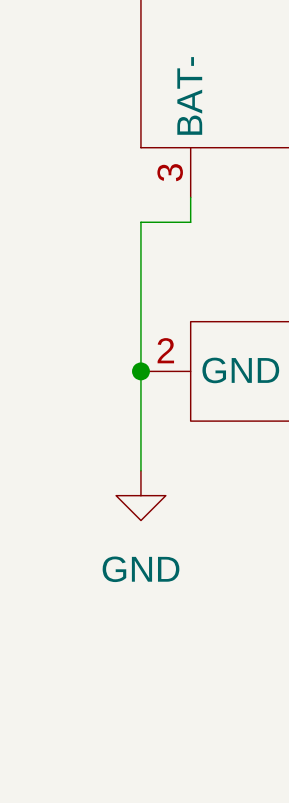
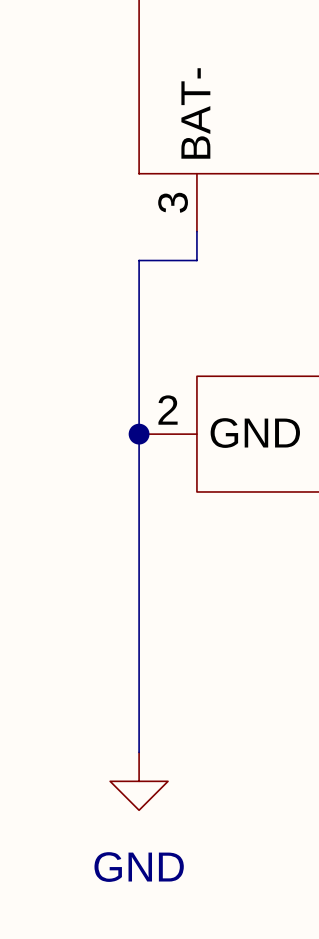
wire: none -> (139, 549) (139, 752)
power symbol position: GND (140, 495) -> GND (139, 781)

